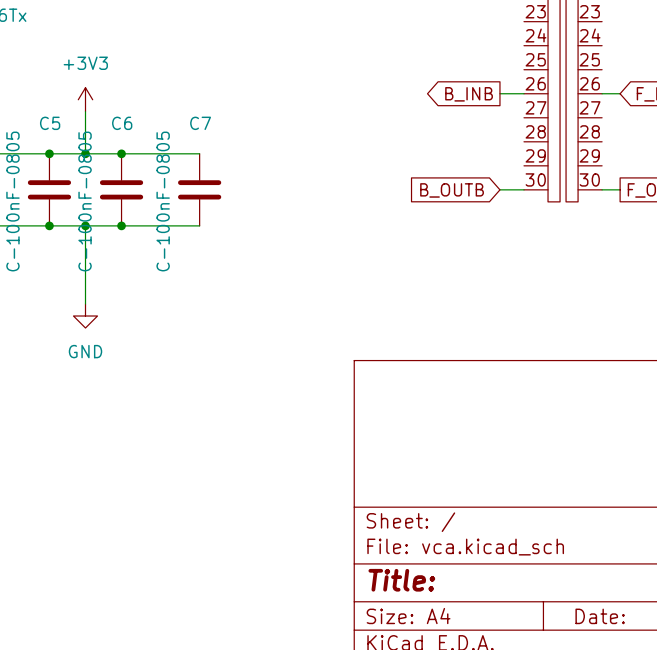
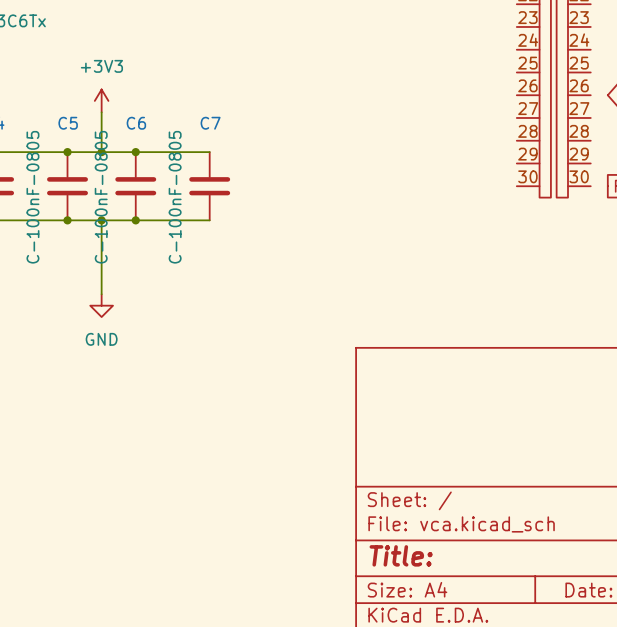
wire: (499, 93) (523, 93) -> none
wire: (602, 93) (620, 93) -> none
global label: B_INB (469, 94) -> none
wire: (499, 189) (523, 189) -> none
wire: (602, 189) (620, 189) -> none
global label: B_OUTB (452, 190) -> none

